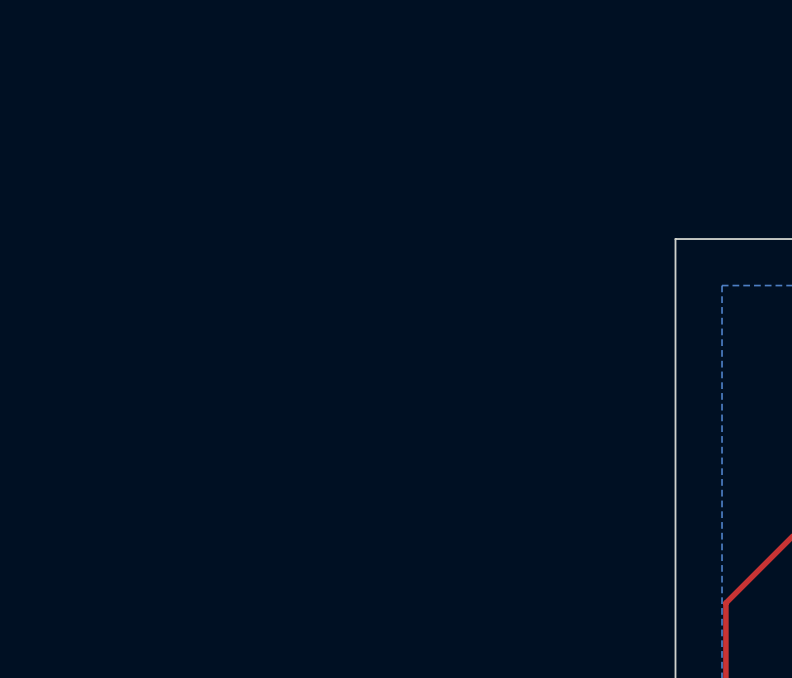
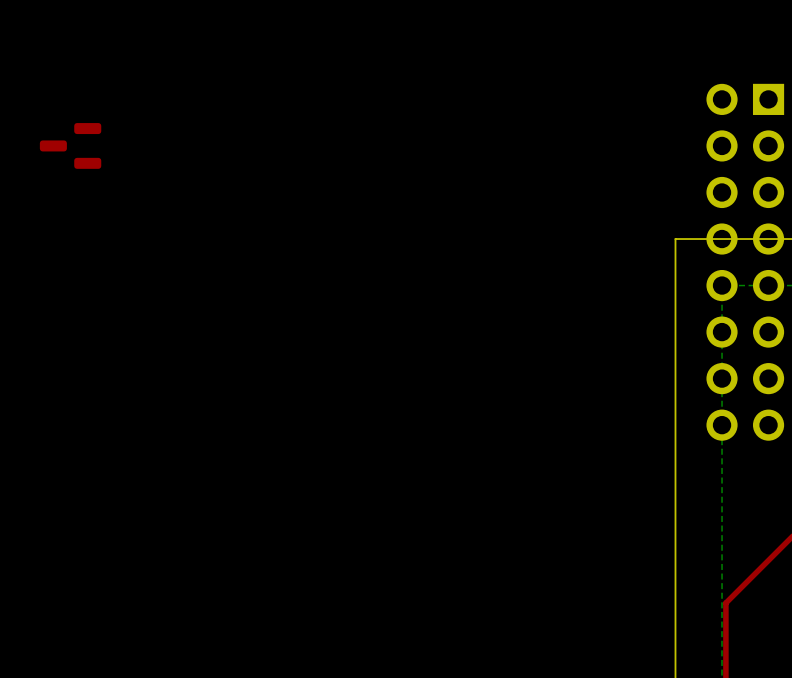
part: none -> (70, 145)
part: none -> (745, 262)

